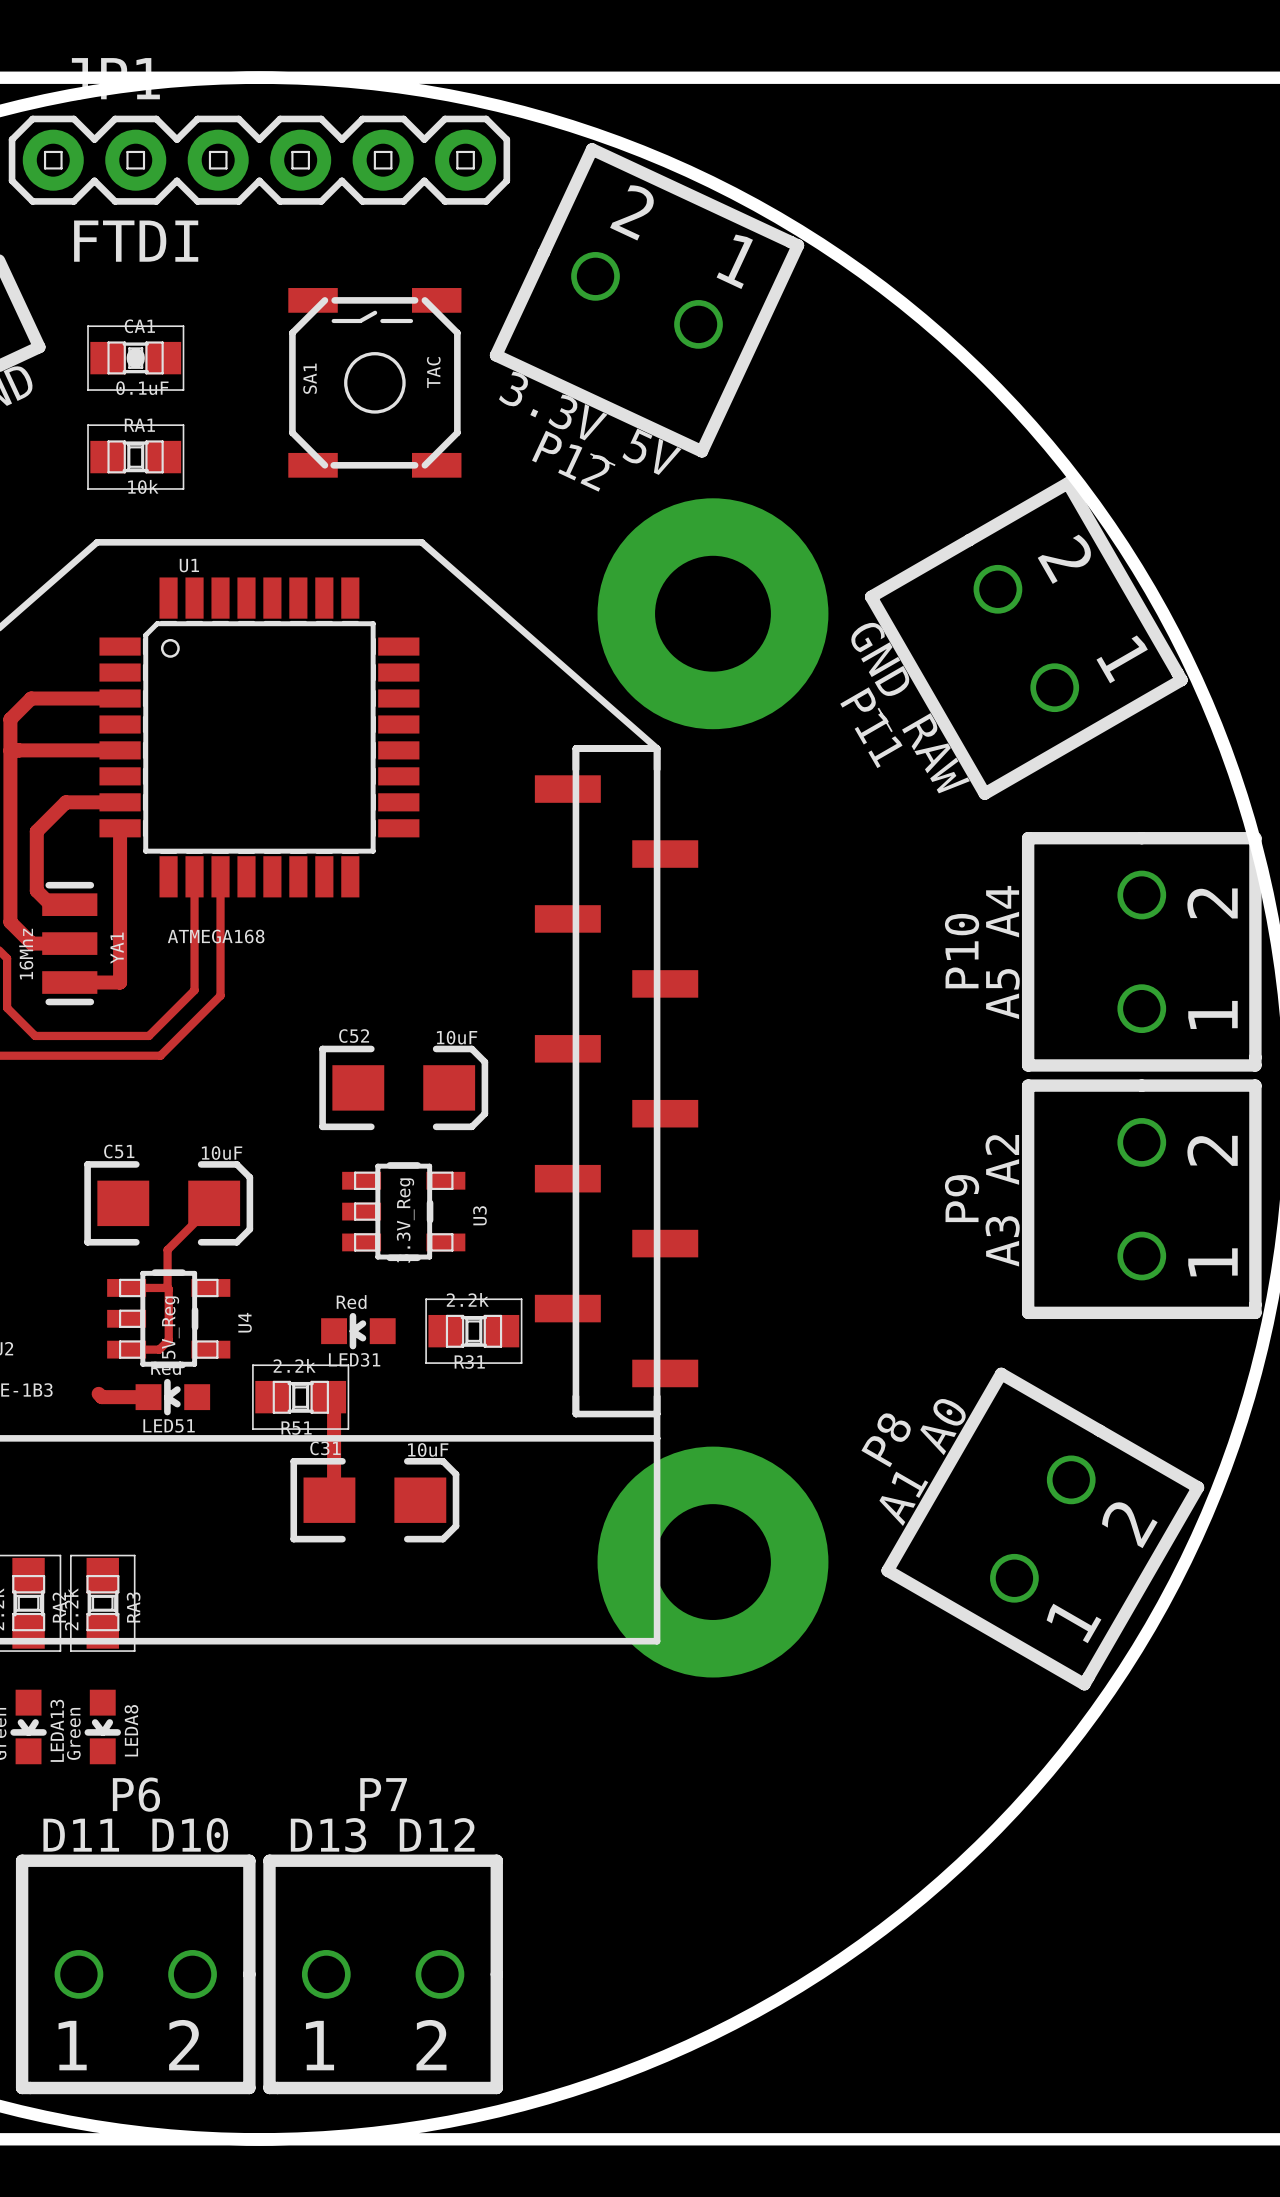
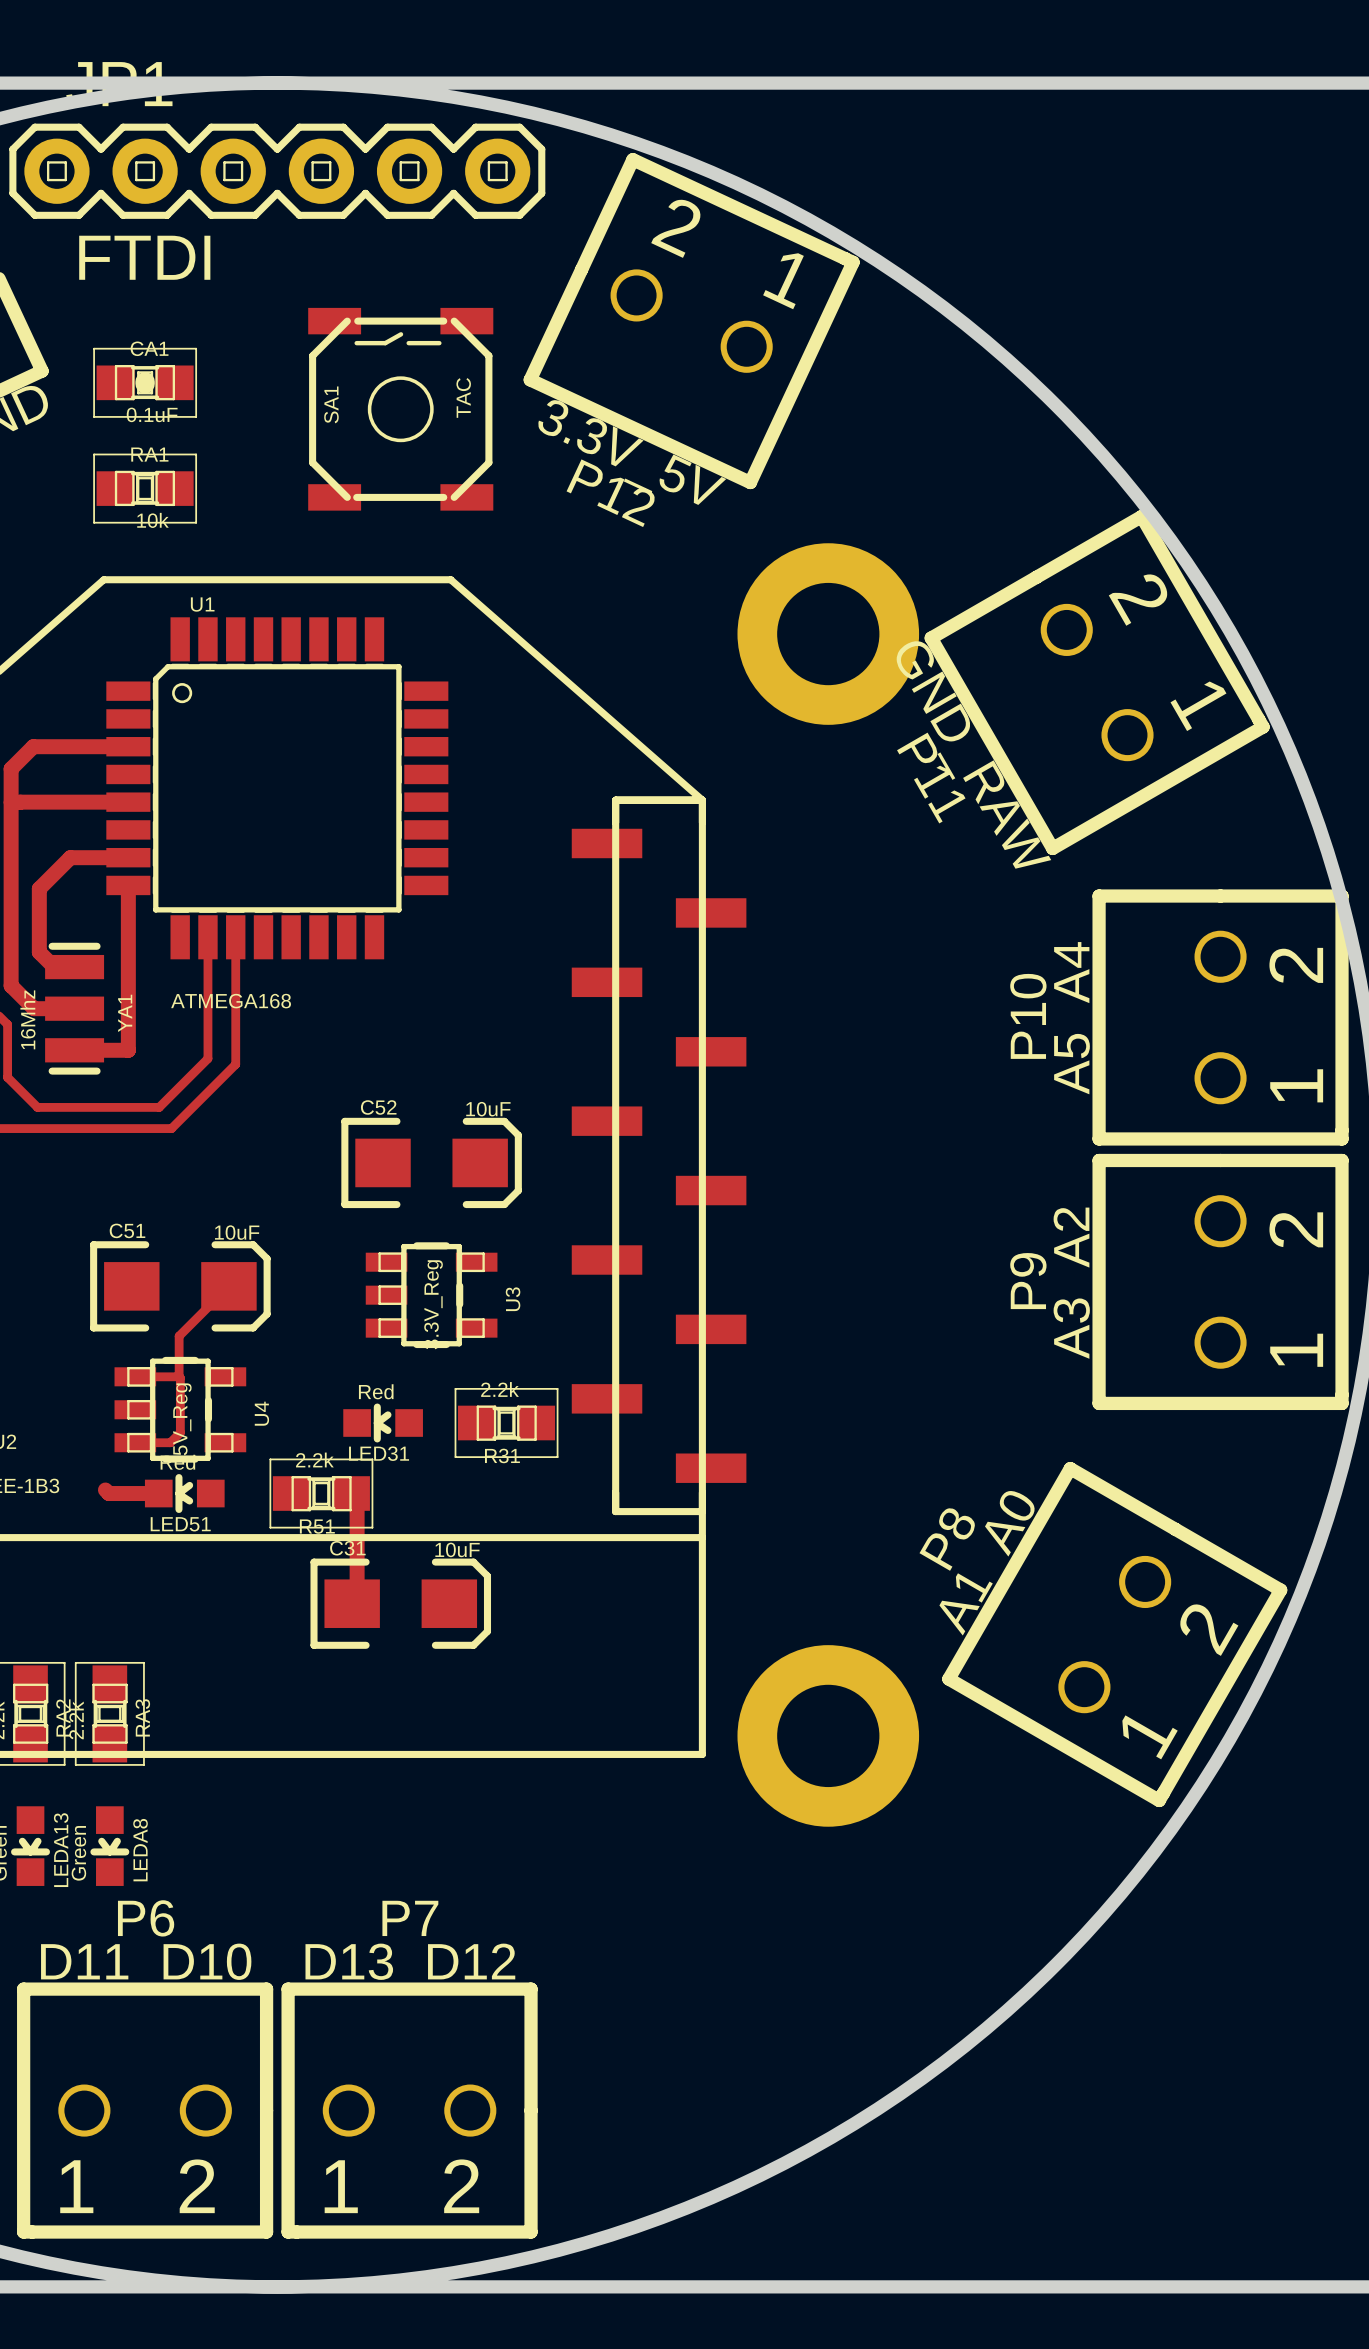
part: none -> (828, 634)
part: (712, 613) -> none
part: (712, 1562) -> none
part: none -> (828, 1735)

